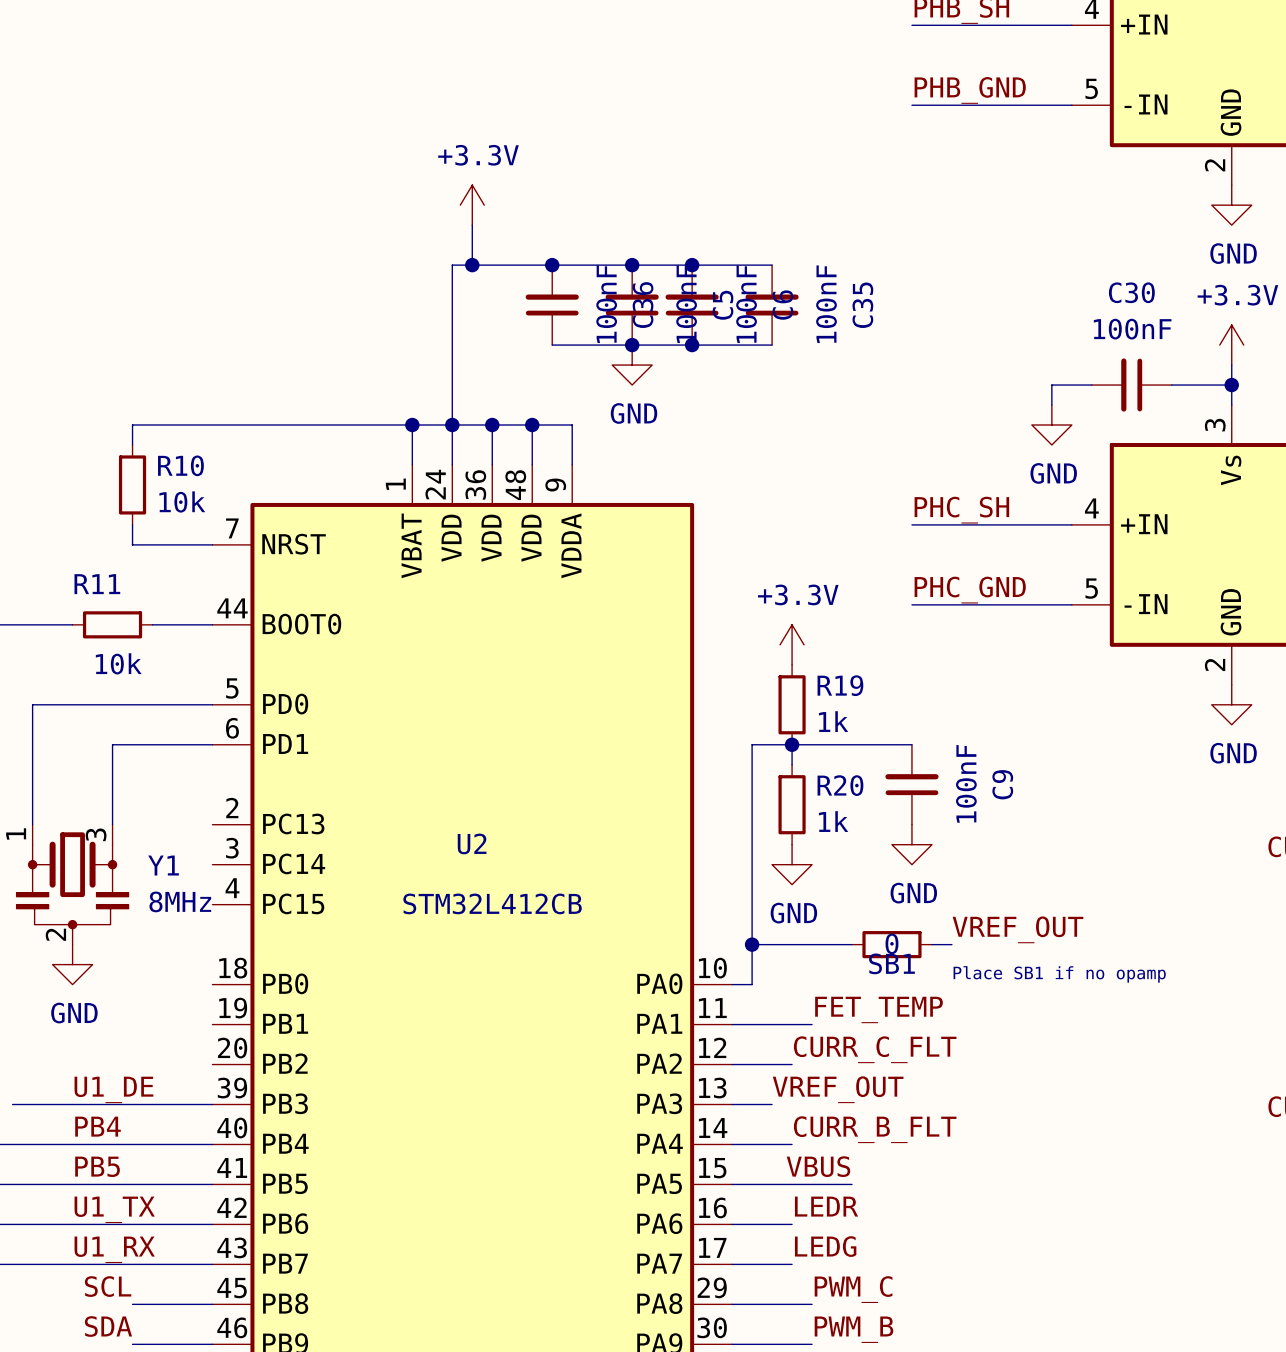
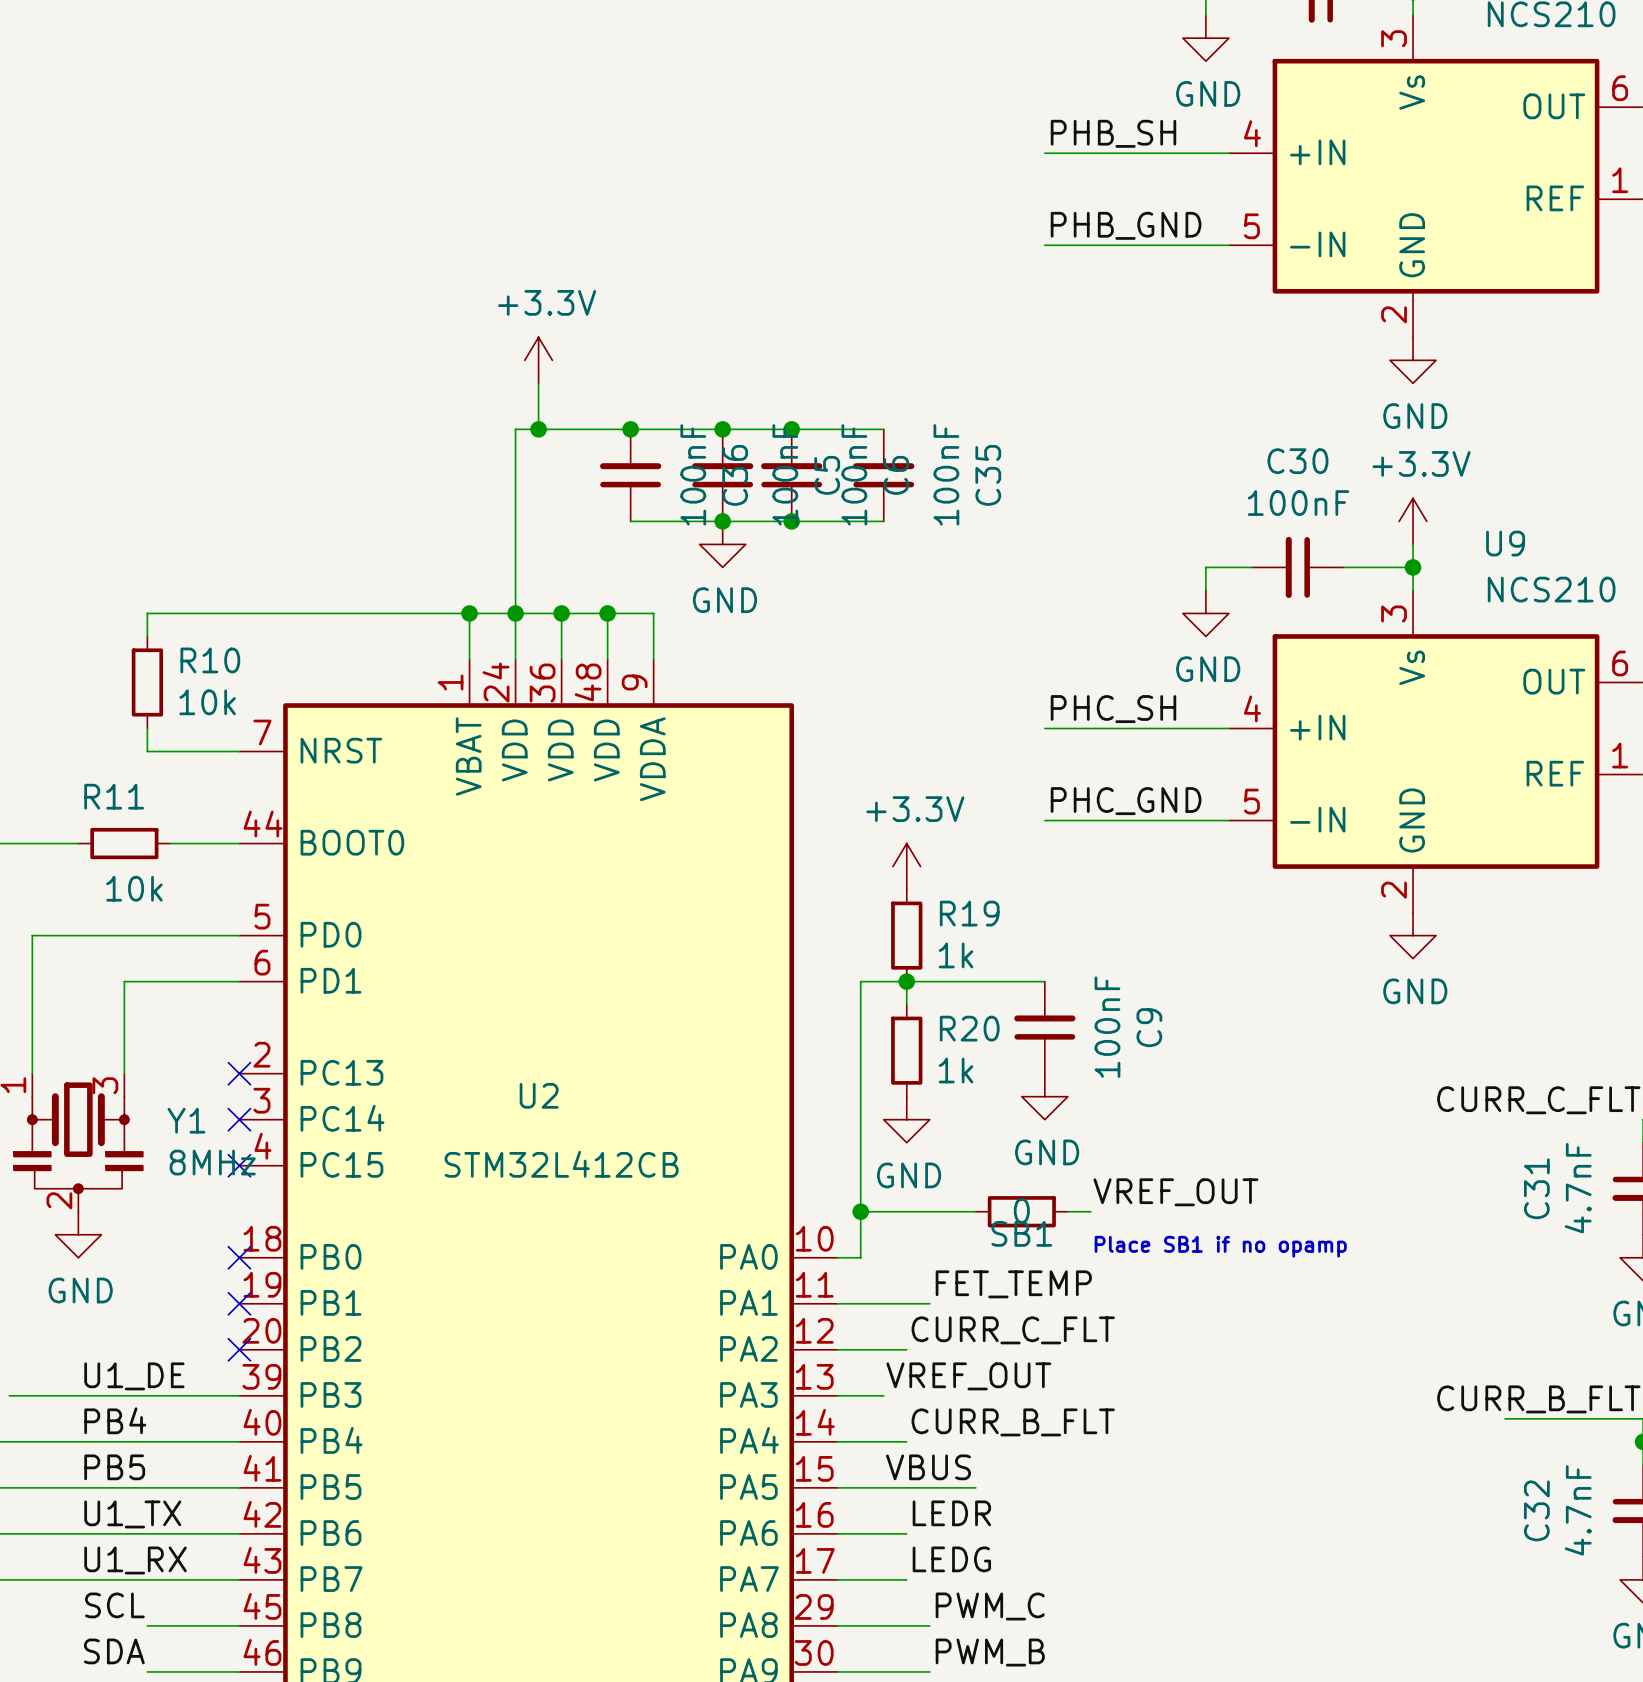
no-connect mark: none -> (239, 1073)
no-connect mark: none -> (239, 1119)
no-connect mark: none -> (239, 1165)
no-connect mark: none -> (239, 1257)
no-connect mark: none -> (239, 1303)
no-connect mark: none -> (239, 1349)

